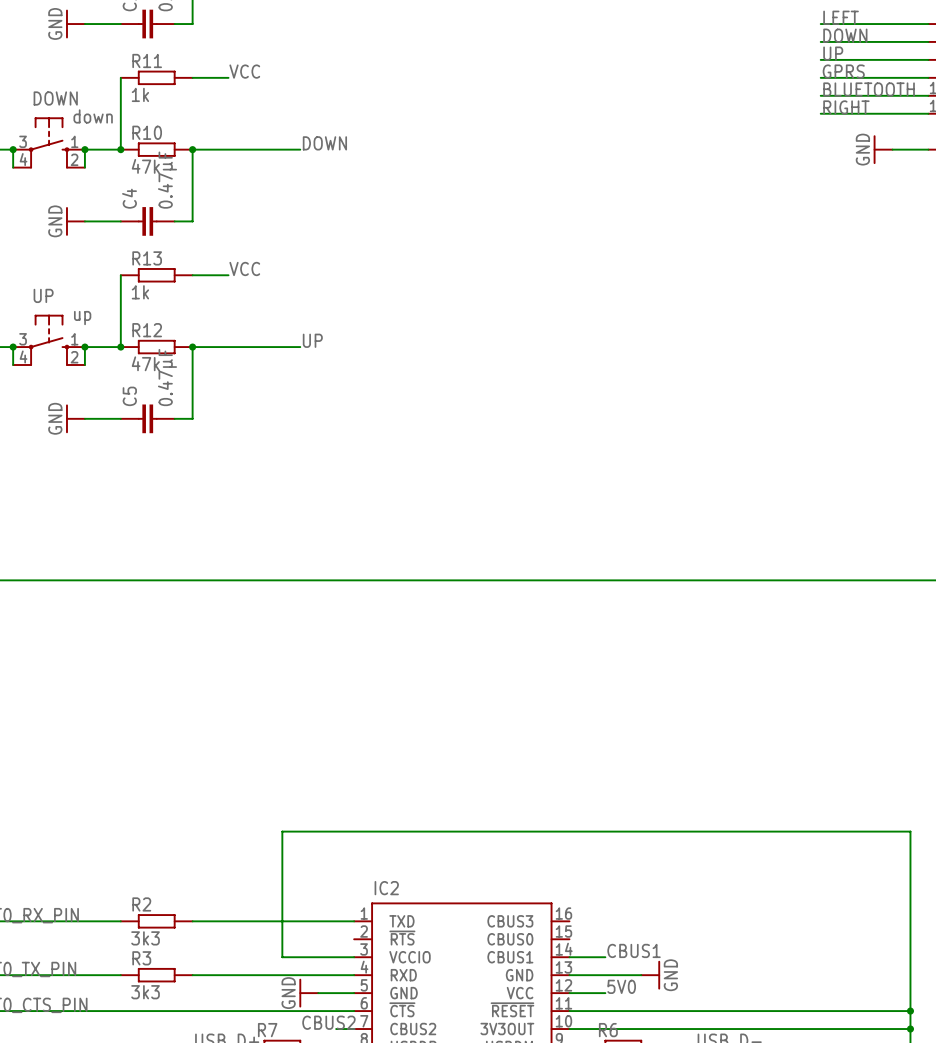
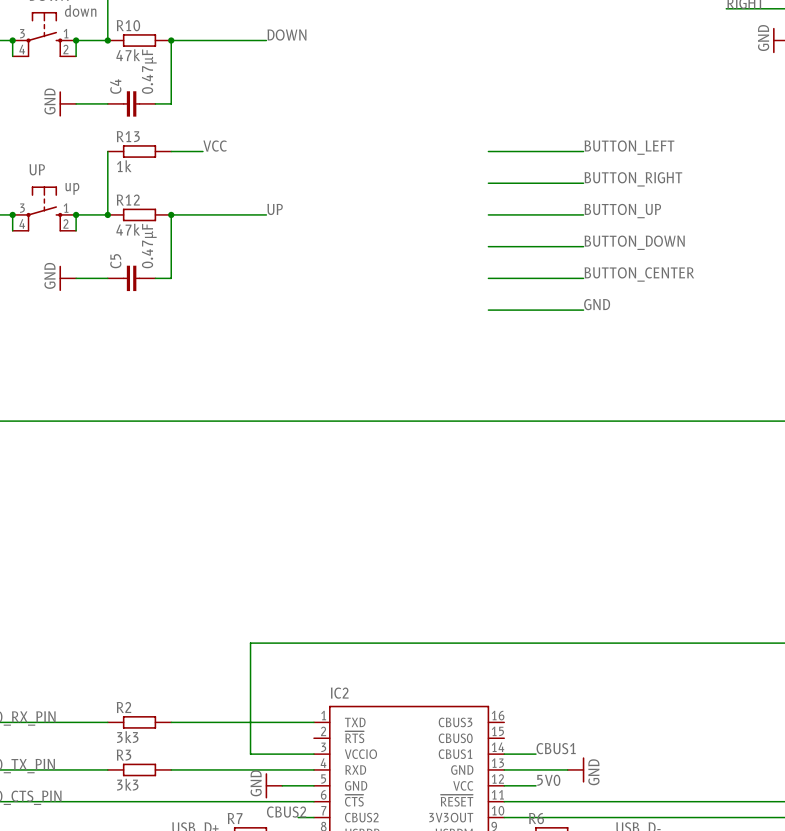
label: none -> BUTTON_LEFT (629, 147)
wire: none -> (488, 151) (583, 151)
label: none -> BUTTON_RIGHT (633, 179)
wire: none -> (488, 183) (583, 183)
label: none -> BUTTON_UP (622, 211)
wire: none -> (488, 214) (583, 214)
label: none -> BUTTON_DOWN (634, 242)
wire: none -> (488, 246) (583, 246)
label: none -> BUTTON_CENTER (639, 274)
wire: none -> (488, 278) (583, 278)
label: none -> GND (597, 304)
wire: none -> (488, 310) (583, 310)

